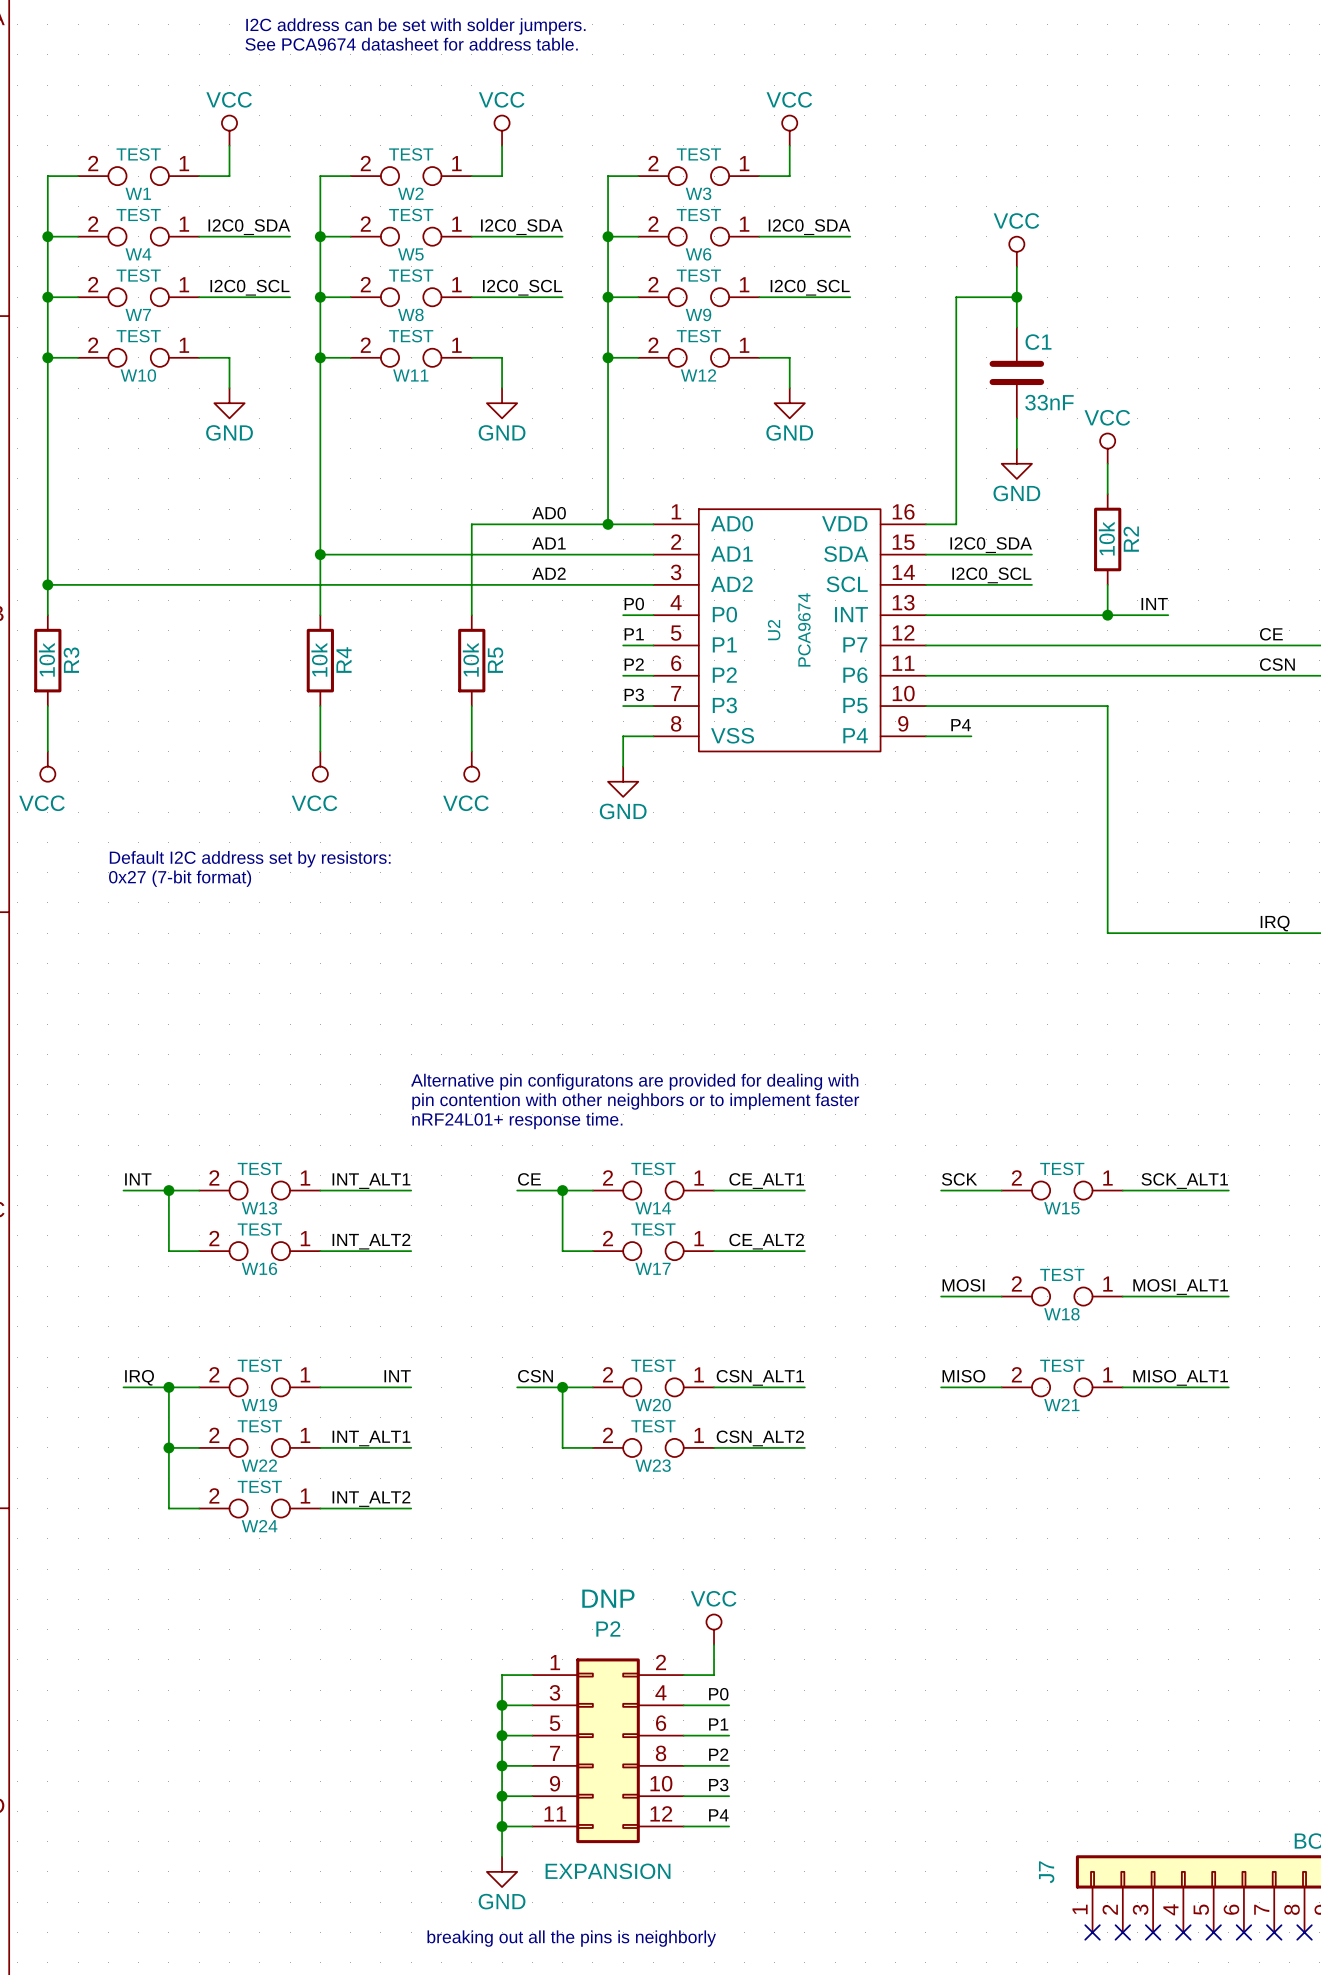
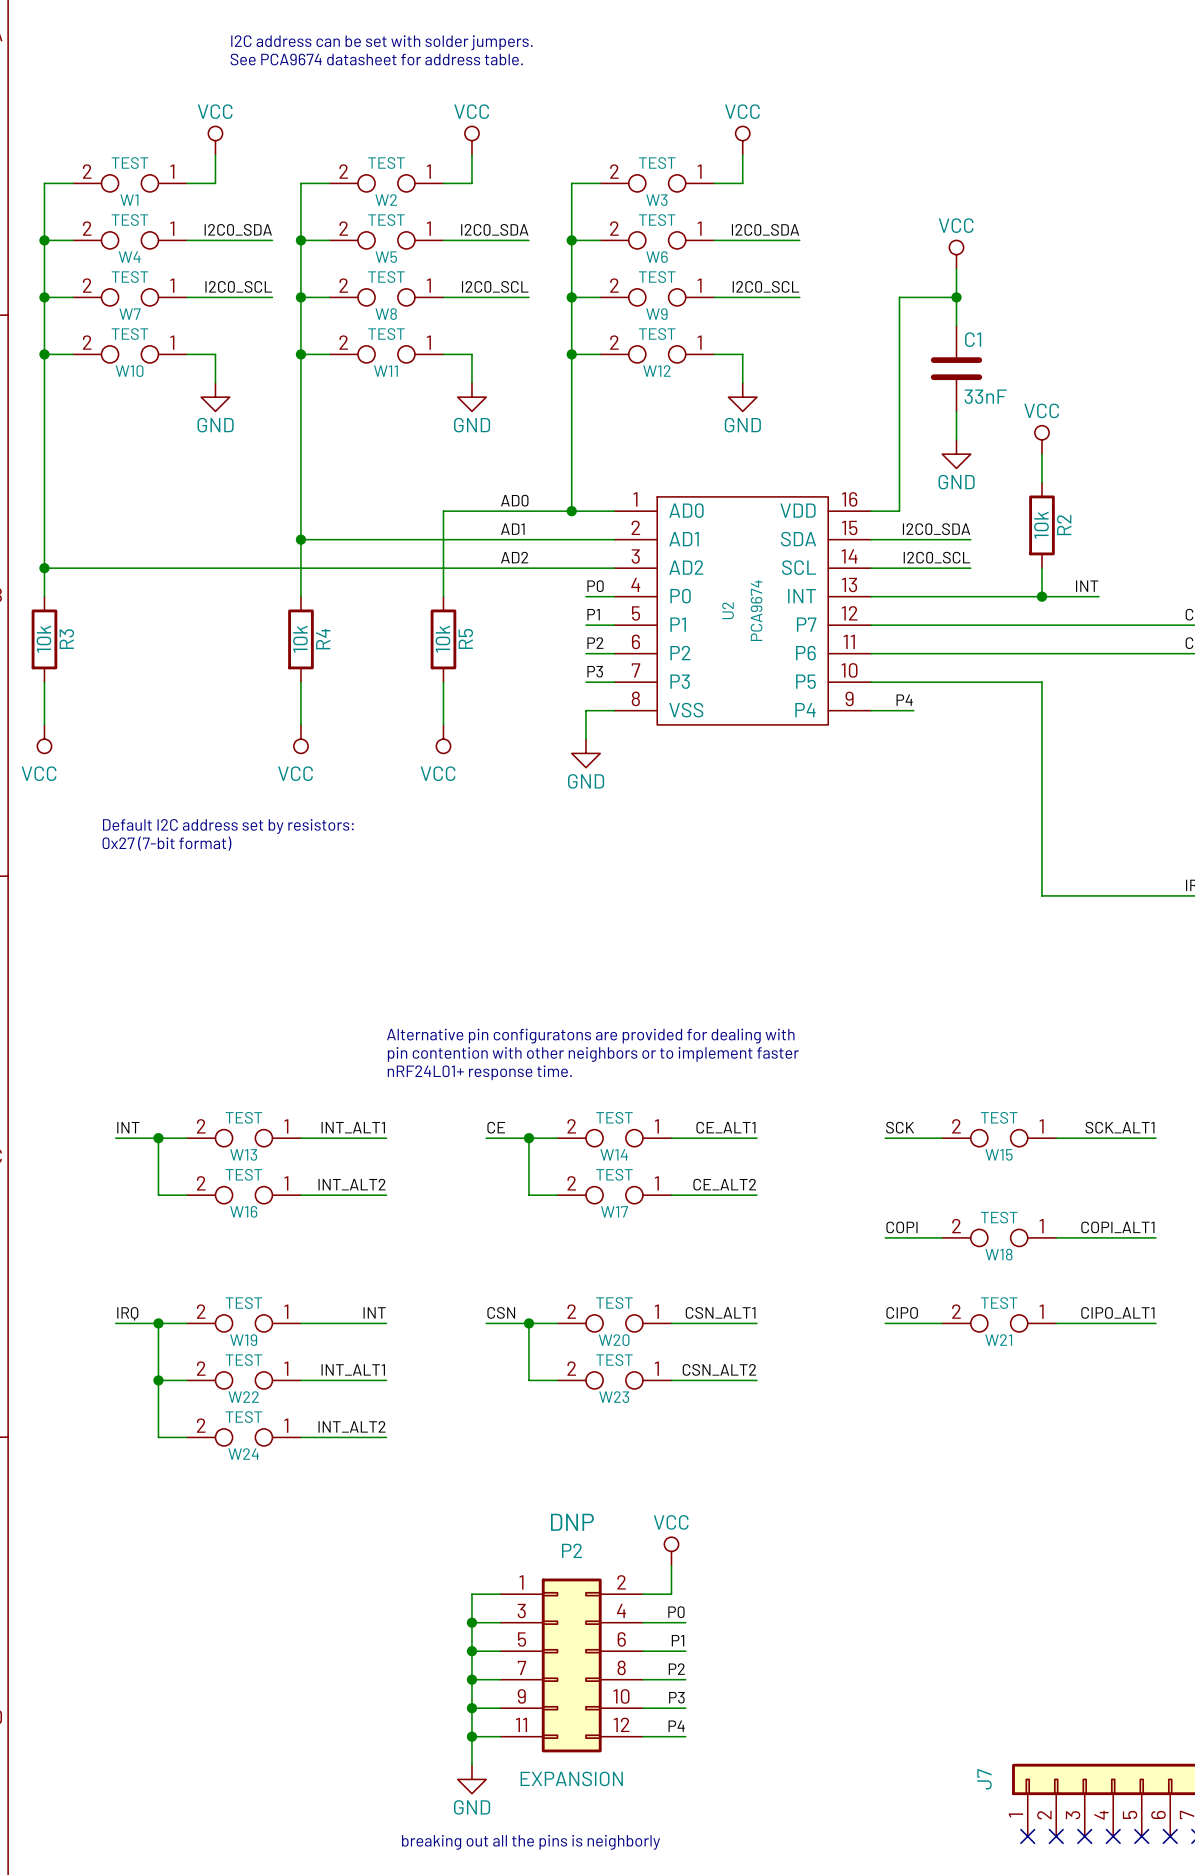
label: MOSI (963, 1285) -> COPI (901, 1227)
label: MOSI_ALT1 (1180, 1287) -> COPI_ALT1 (1117, 1227)
label: MISO (963, 1376) -> CIPO (902, 1312)
label: MISO_ALT1 (1180, 1377) -> CIPO_ALT1 (1117, 1312)

